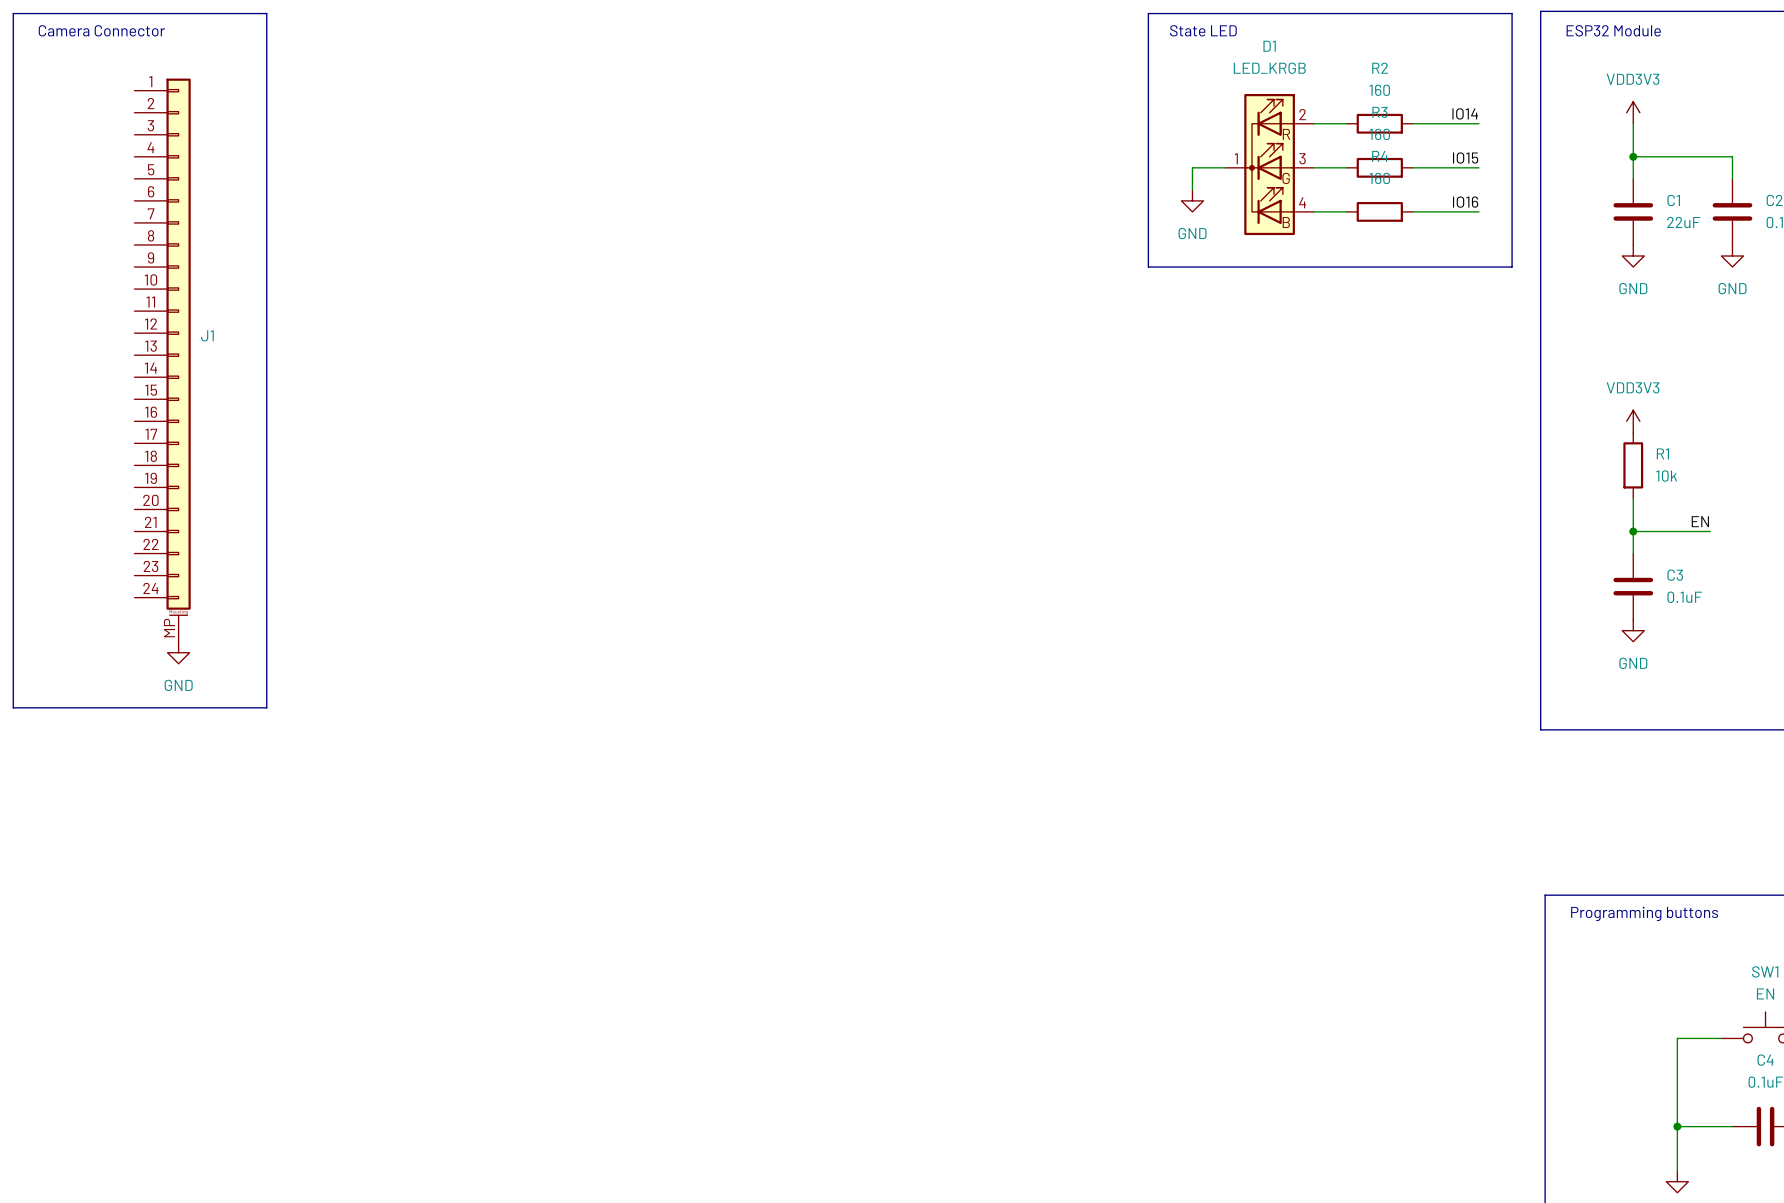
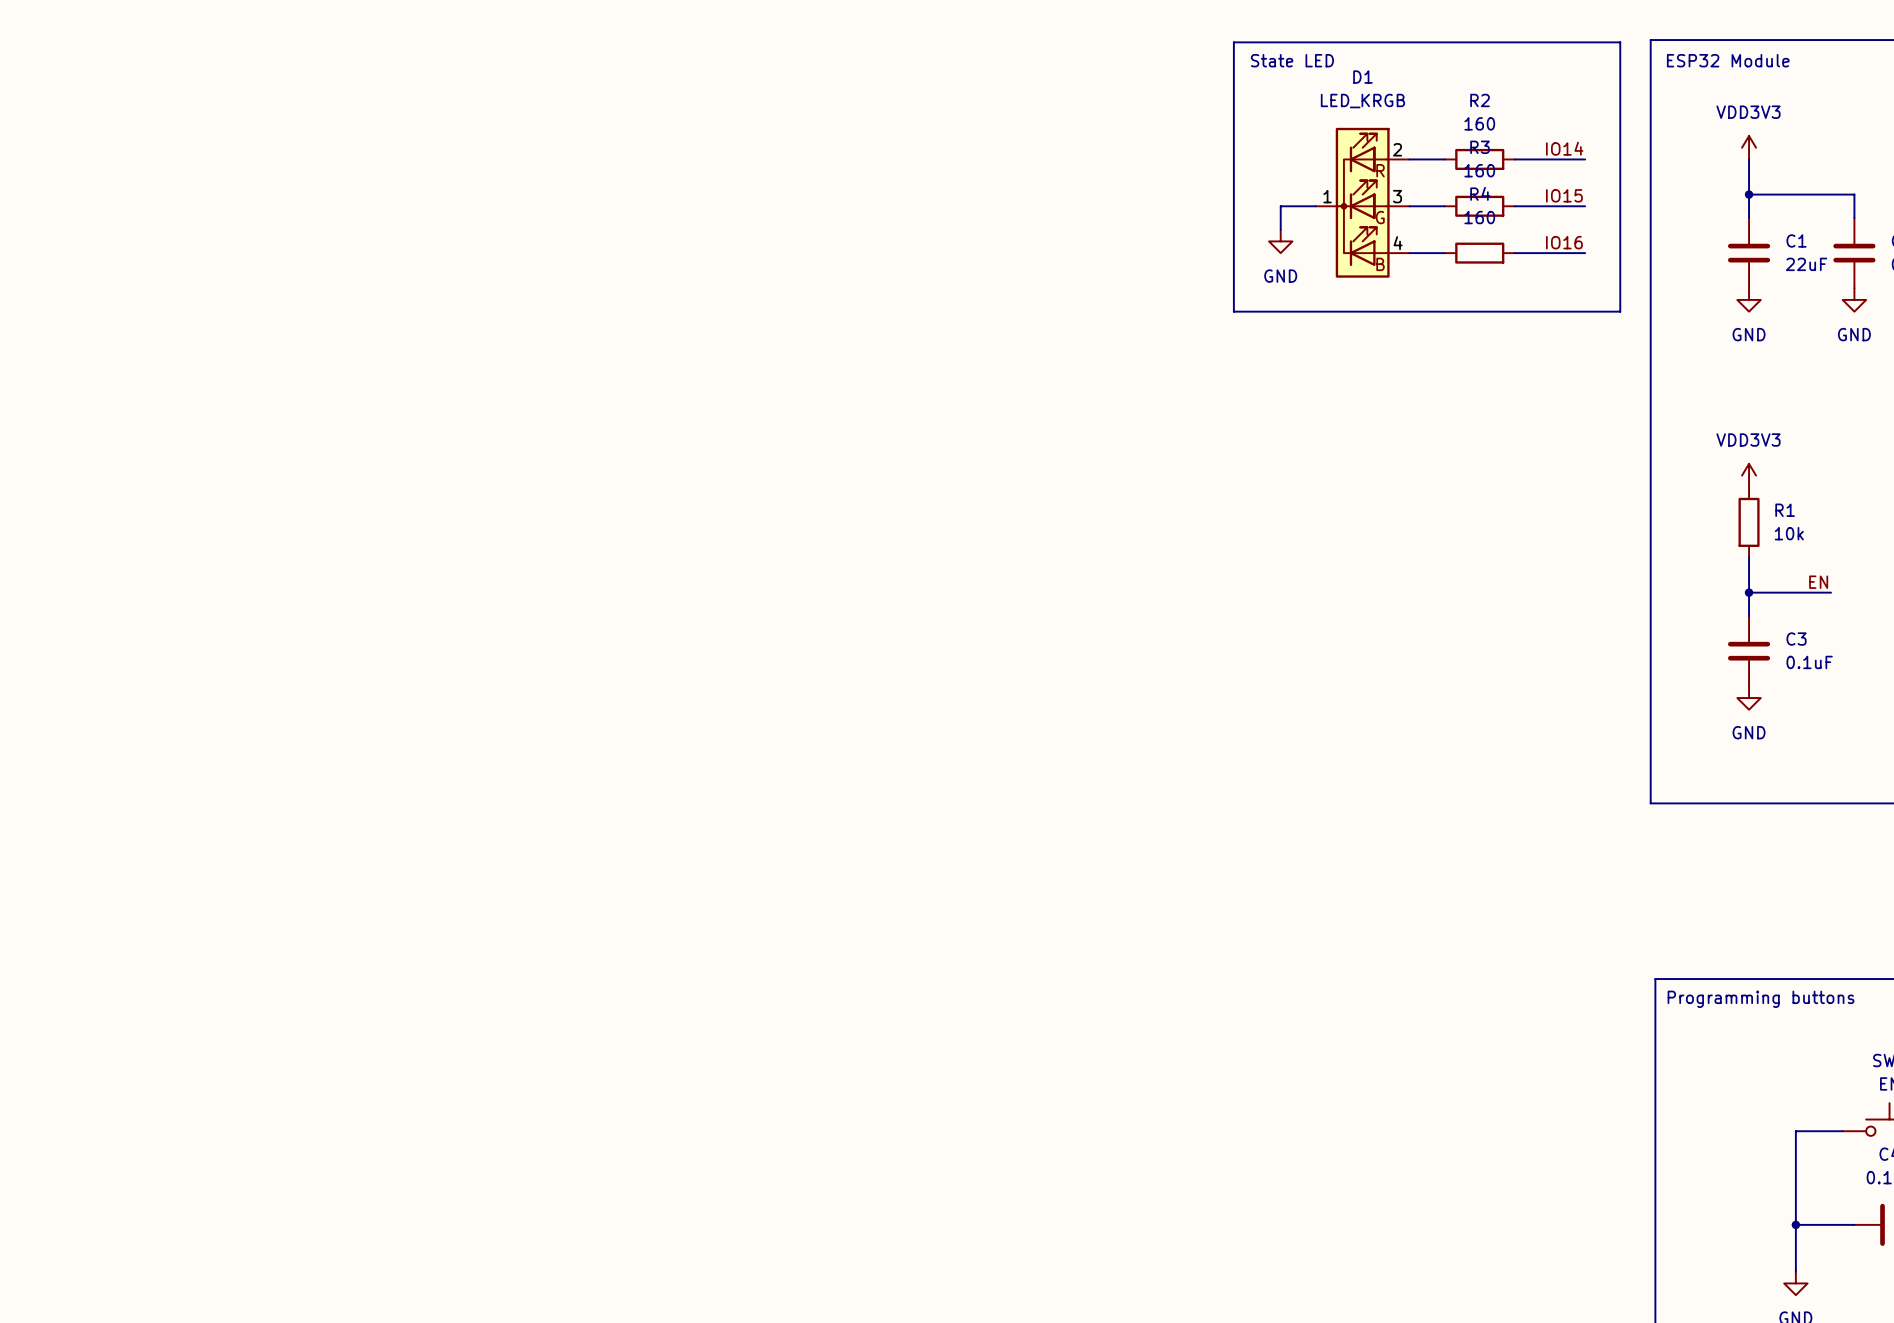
line: (13, 13) (266, 13) (266, 707) (13, 707) (13, 13) -> none
text: Camera Connector (101, 30) -> none
J1: (162, 360) -> none
power symbol: GND (178, 652) -> none

